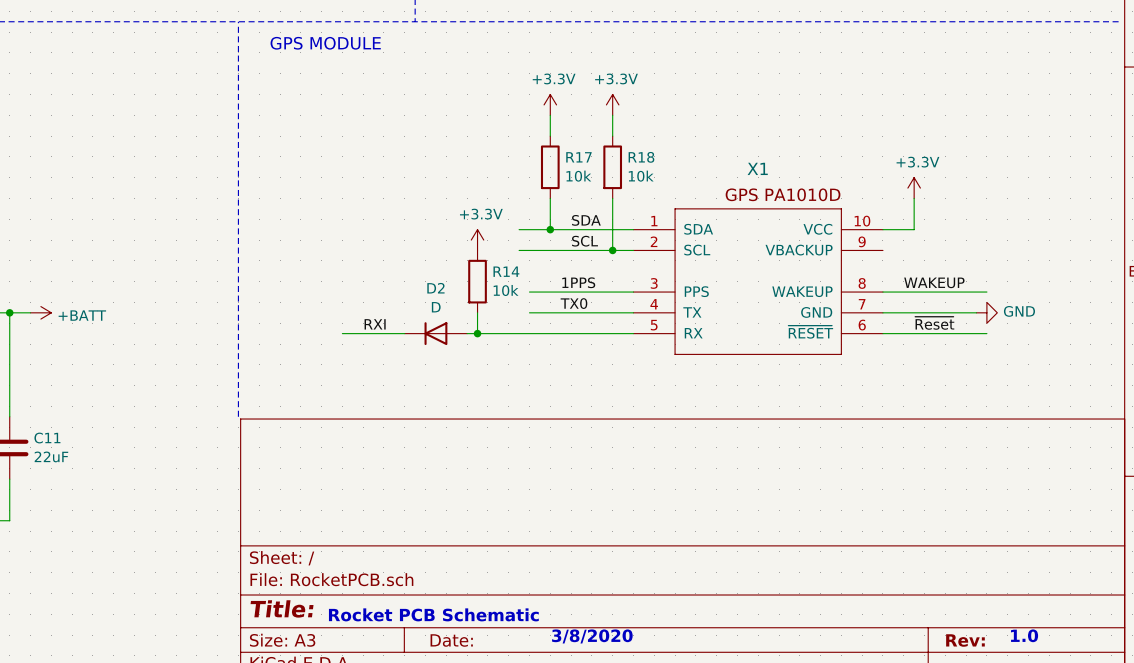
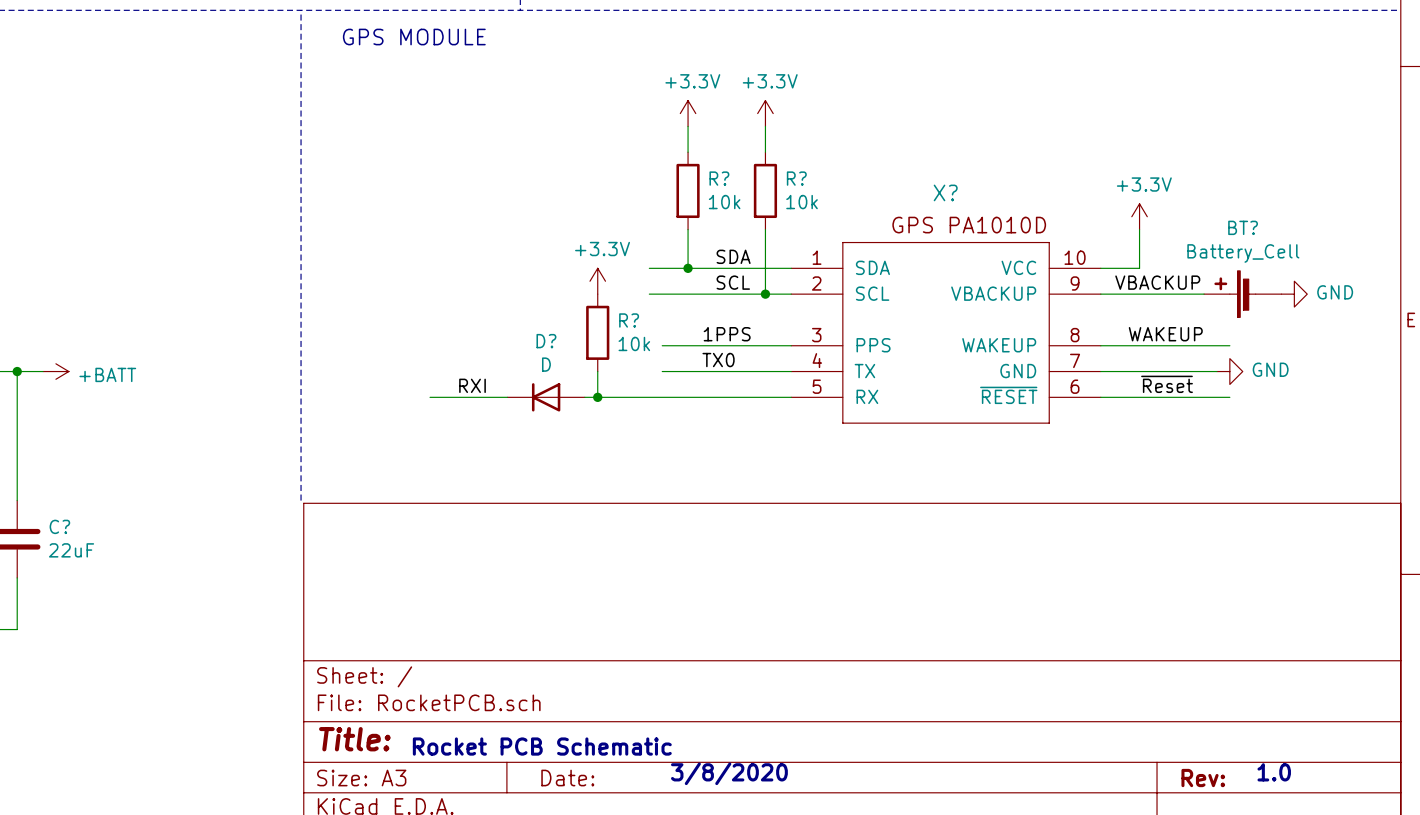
R17 name: R17 (578, 157) -> R? (719, 178)
R18 name: R18 (641, 157) -> R? (796, 178)
X1 name: X1 (757, 168) -> X? (945, 192)
label: none -> VBACKUP (1157, 282)
wire: none -> (1100, 294) (1204, 294)
BT?: none -> Battery_Cell (1242, 294)
power symbol: none -> GND (1294, 294)
R14 name: R14 (506, 271) -> R? (629, 320)
D2 name: D2 (435, 288) -> D? (546, 341)
C11 name: C11 (47, 438) -> C? (59, 526)

